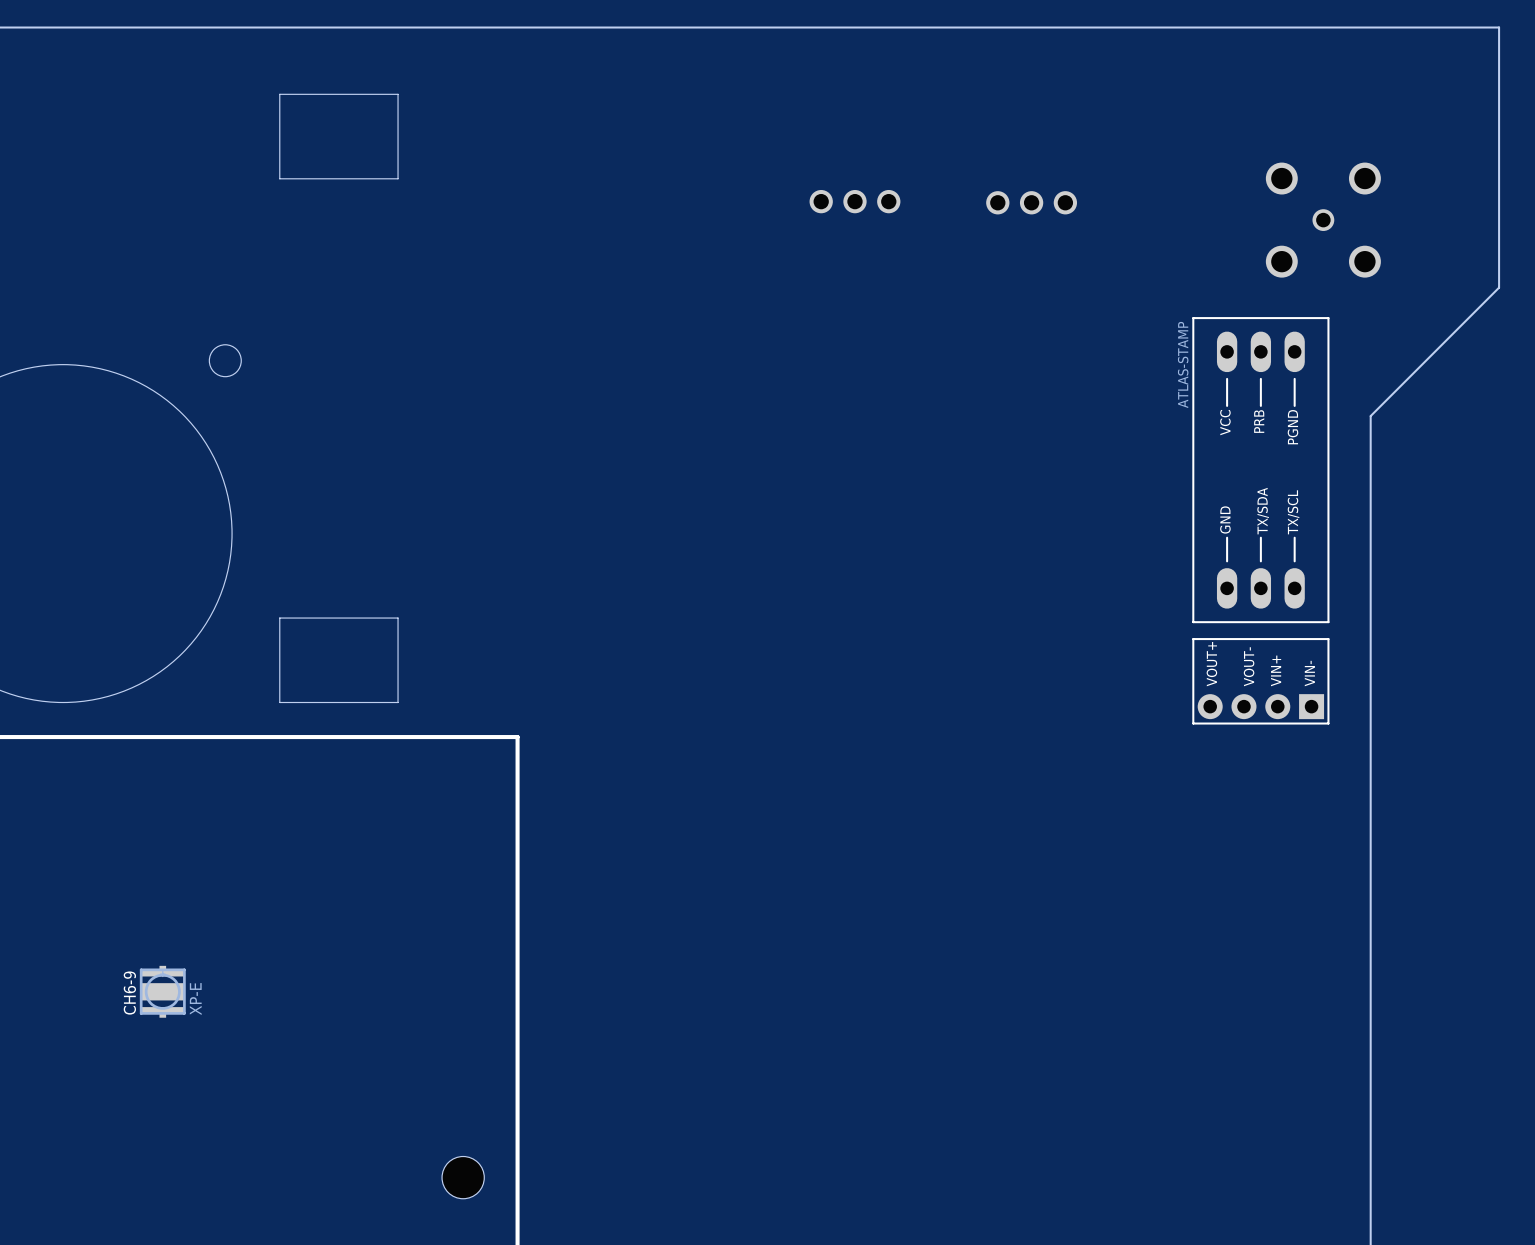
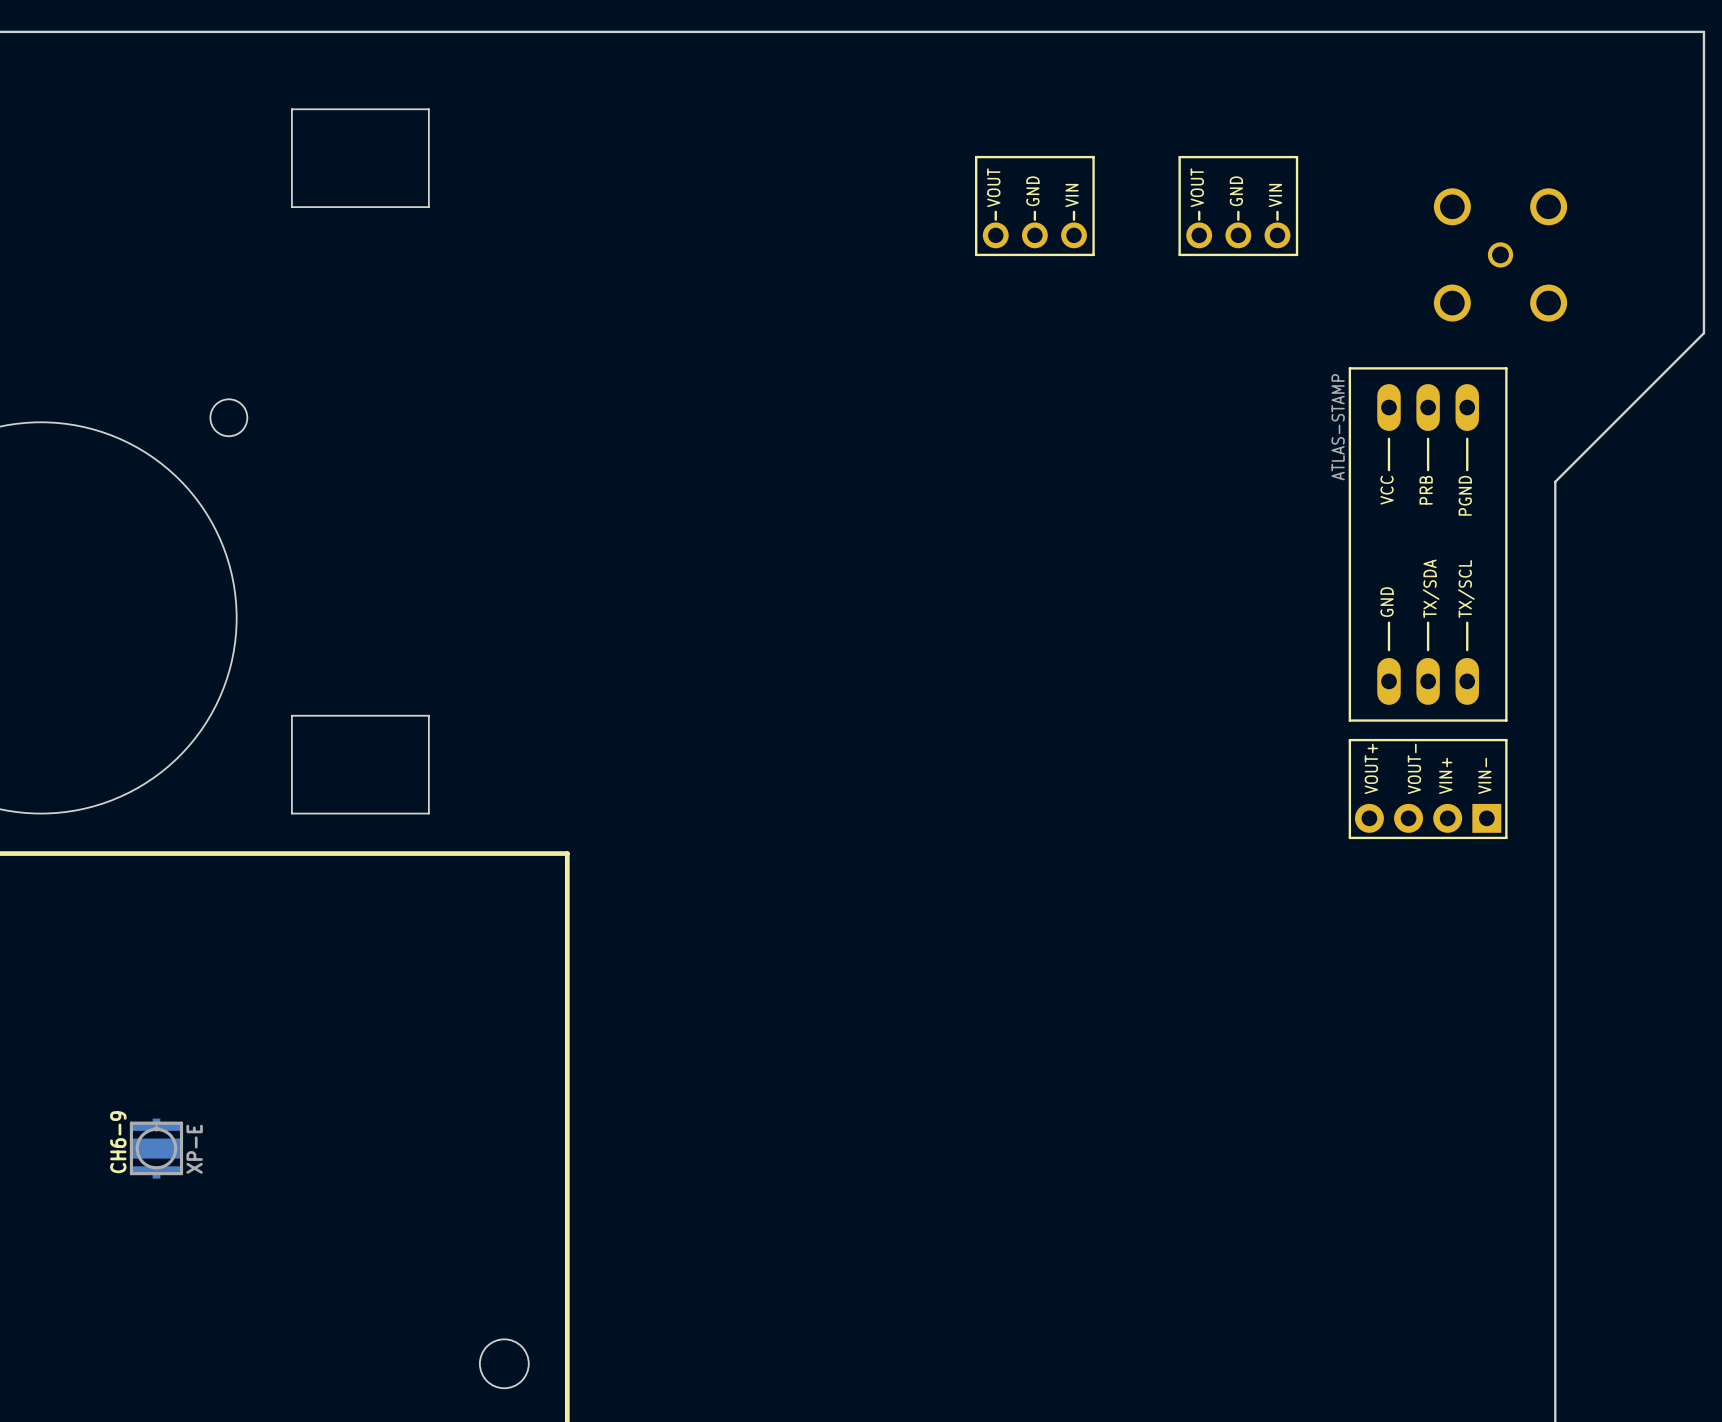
part: none -> (1034, 206)
part: none -> (1238, 206)
part: (854, 201) -> none
part: (1031, 202) -> none

